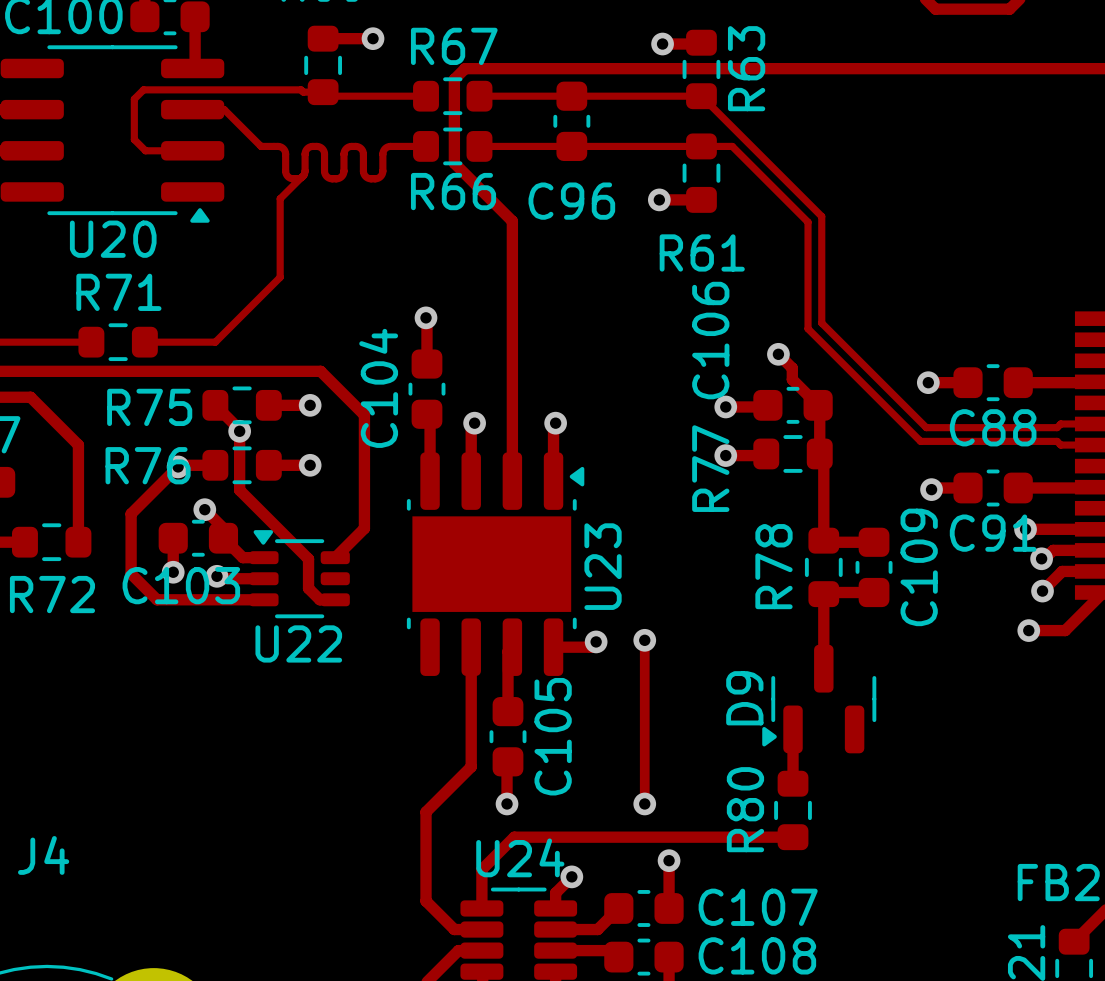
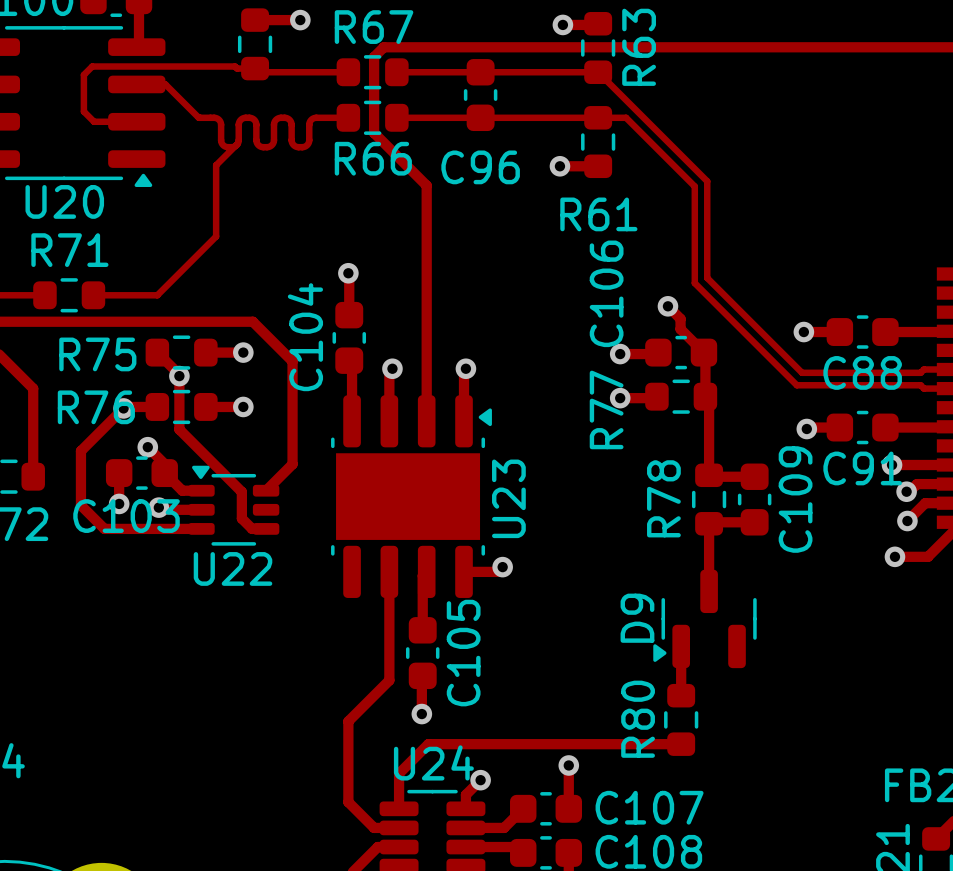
track: (644, 640) (644, 803) -> none
via: (644, 640) -> none
via: (644, 803) -> none

